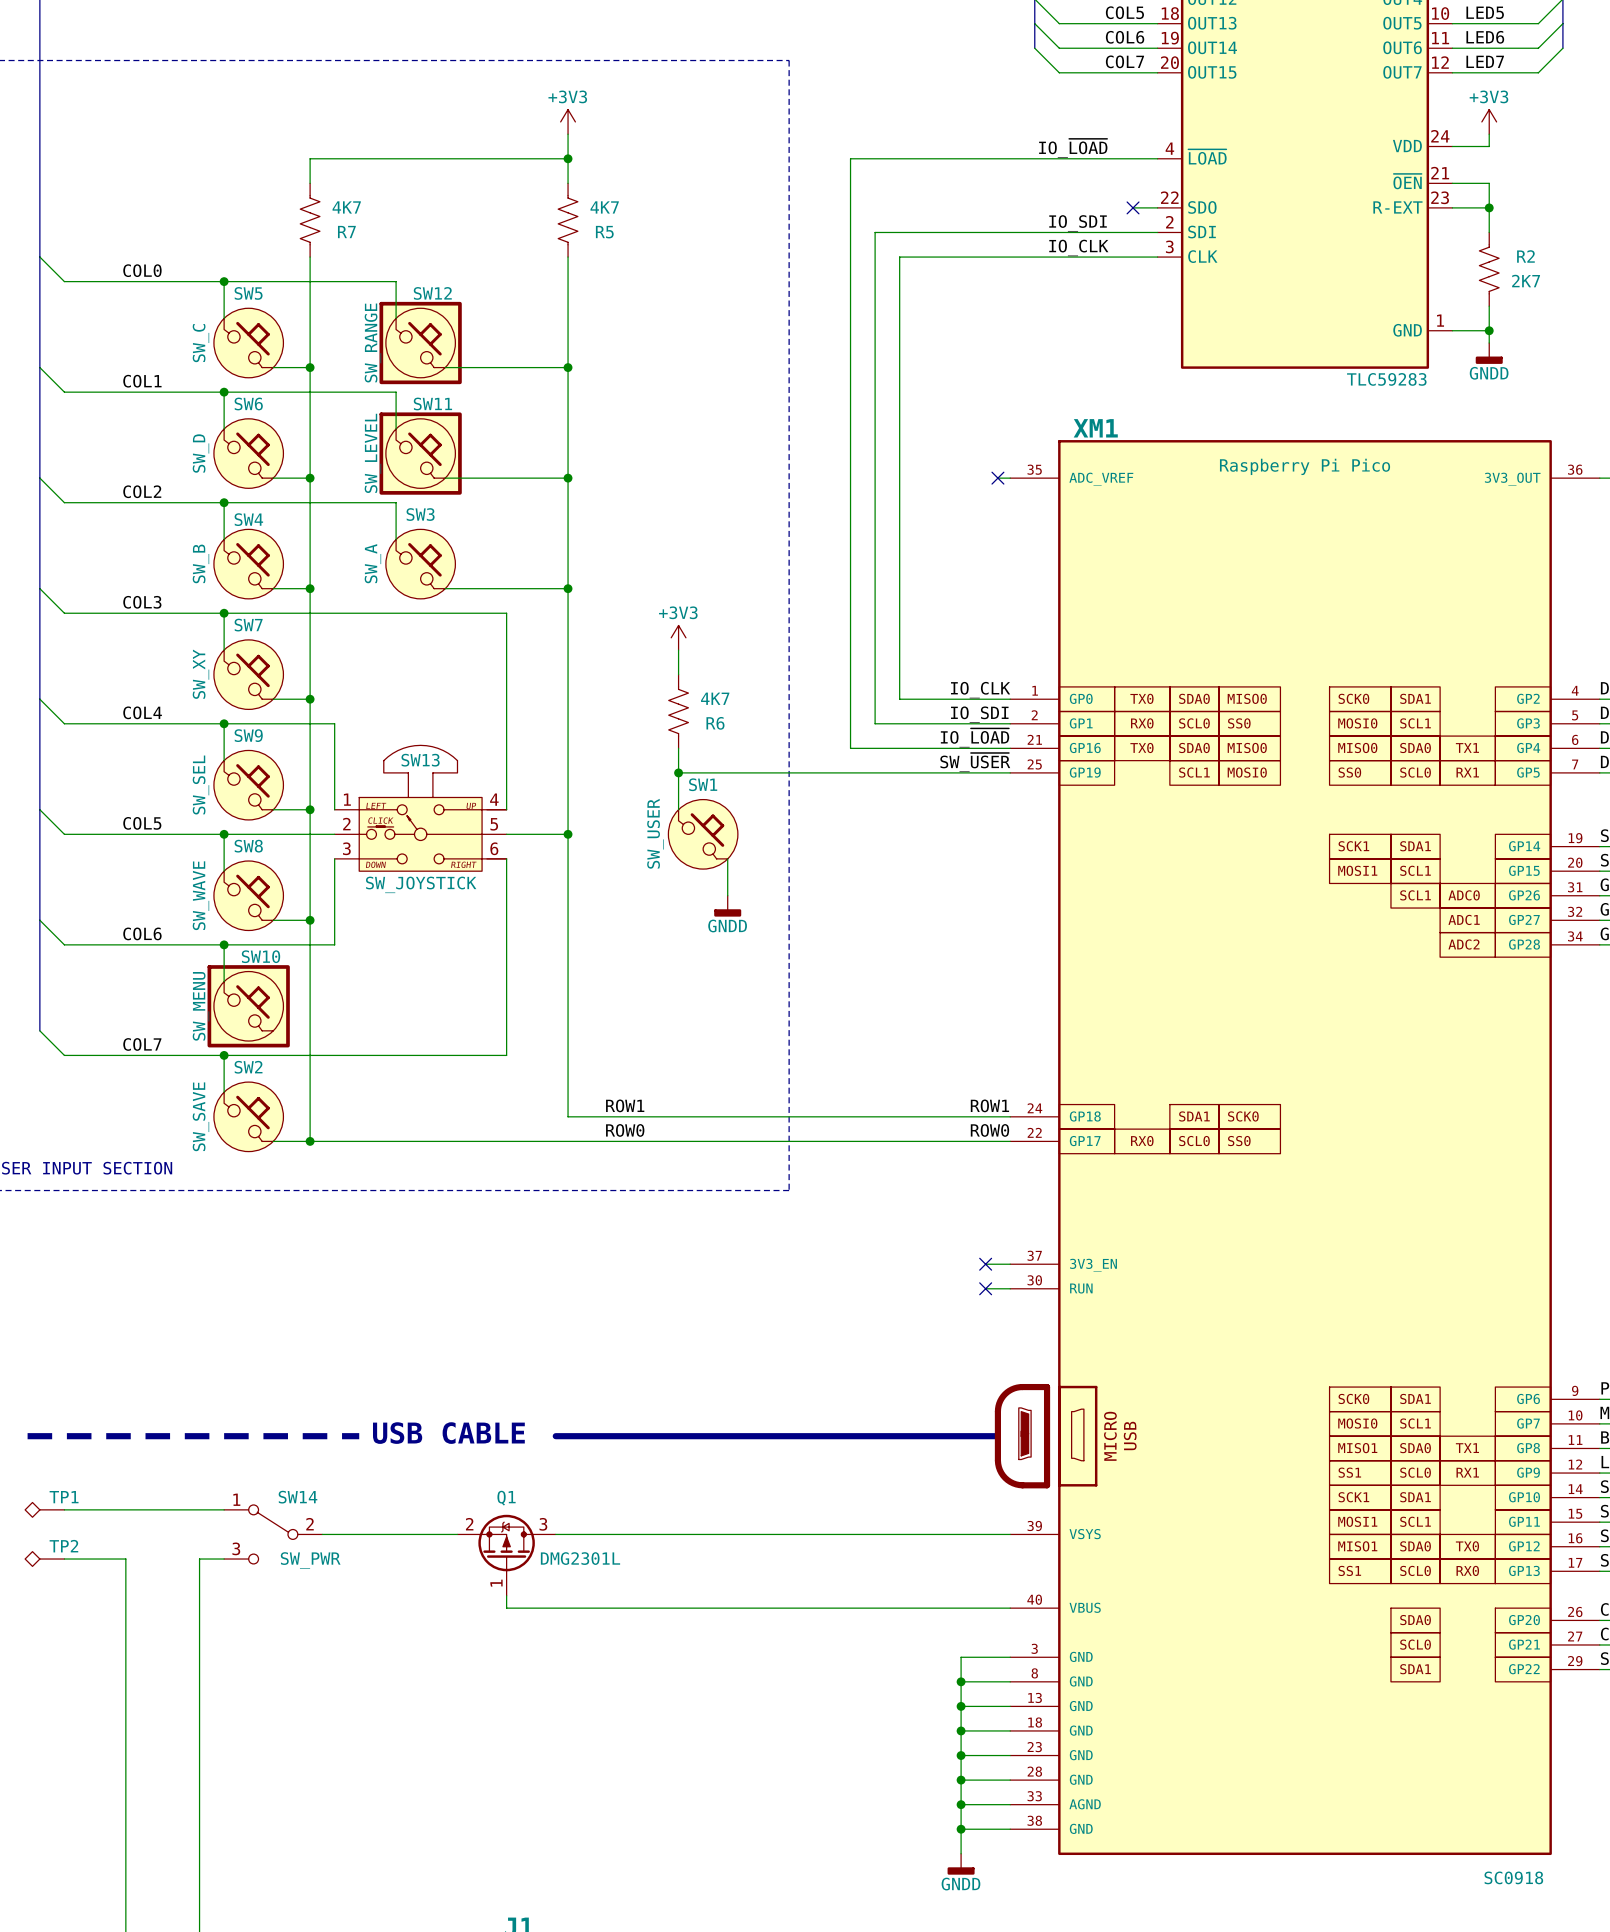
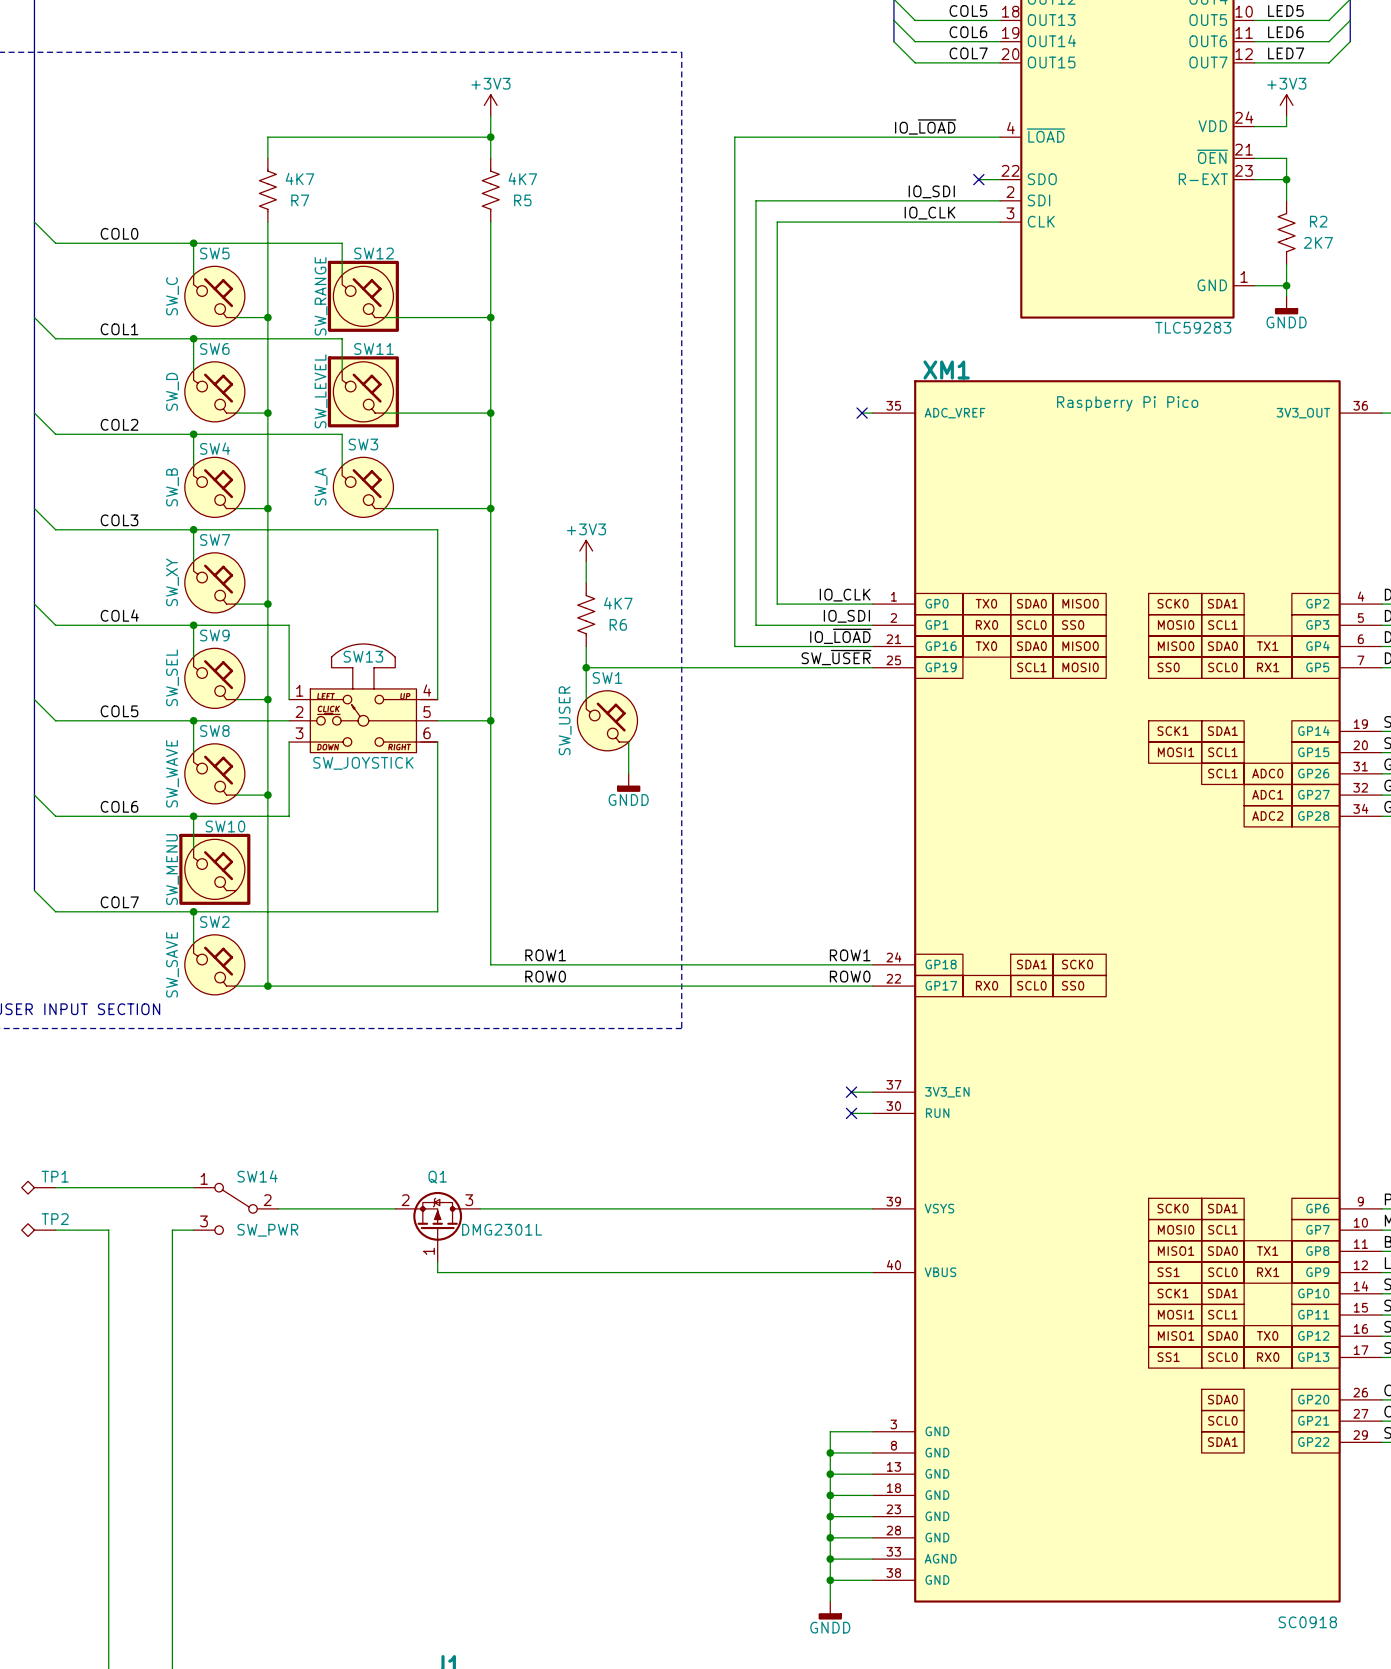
XM1 symbol: [1010, 440, 1600, 1856] -> [872, 380, 1383, 1603]
text: USB CABLE (448, 1433) -> none
line: (27, 1436) (359, 1436) -> none
line: (555, 1436) (997, 1436) -> none
part: (1022, 1436) -> none
TP1 position: (44, 1509) -> (38, 1187)
wire: (64, 1509) (224, 1509) -> (55, 1187) (193, 1187)
SW14 position: (273, 1534) -> (236, 1208)
wire: (322, 1534) (457, 1534) -> (278, 1208) (395, 1208)
wire: (555, 1534) (1010, 1534) -> (480, 1208) (872, 1208)
Q1 position: (506, 1555) -> (437, 1226)
TP2 position: (44, 1559) -> (38, 1230)
wire: (64, 1559) (125, 1559) -> (55, 1230) (108, 1230) (108, 1346)
wire: (199, 1559) (224, 1559) -> (172, 1346) (172, 1230) (193, 1230)
wire: (506, 1595) (506, 1608) (1010, 1608) -> (437, 1261) (437, 1272) (872, 1272)

